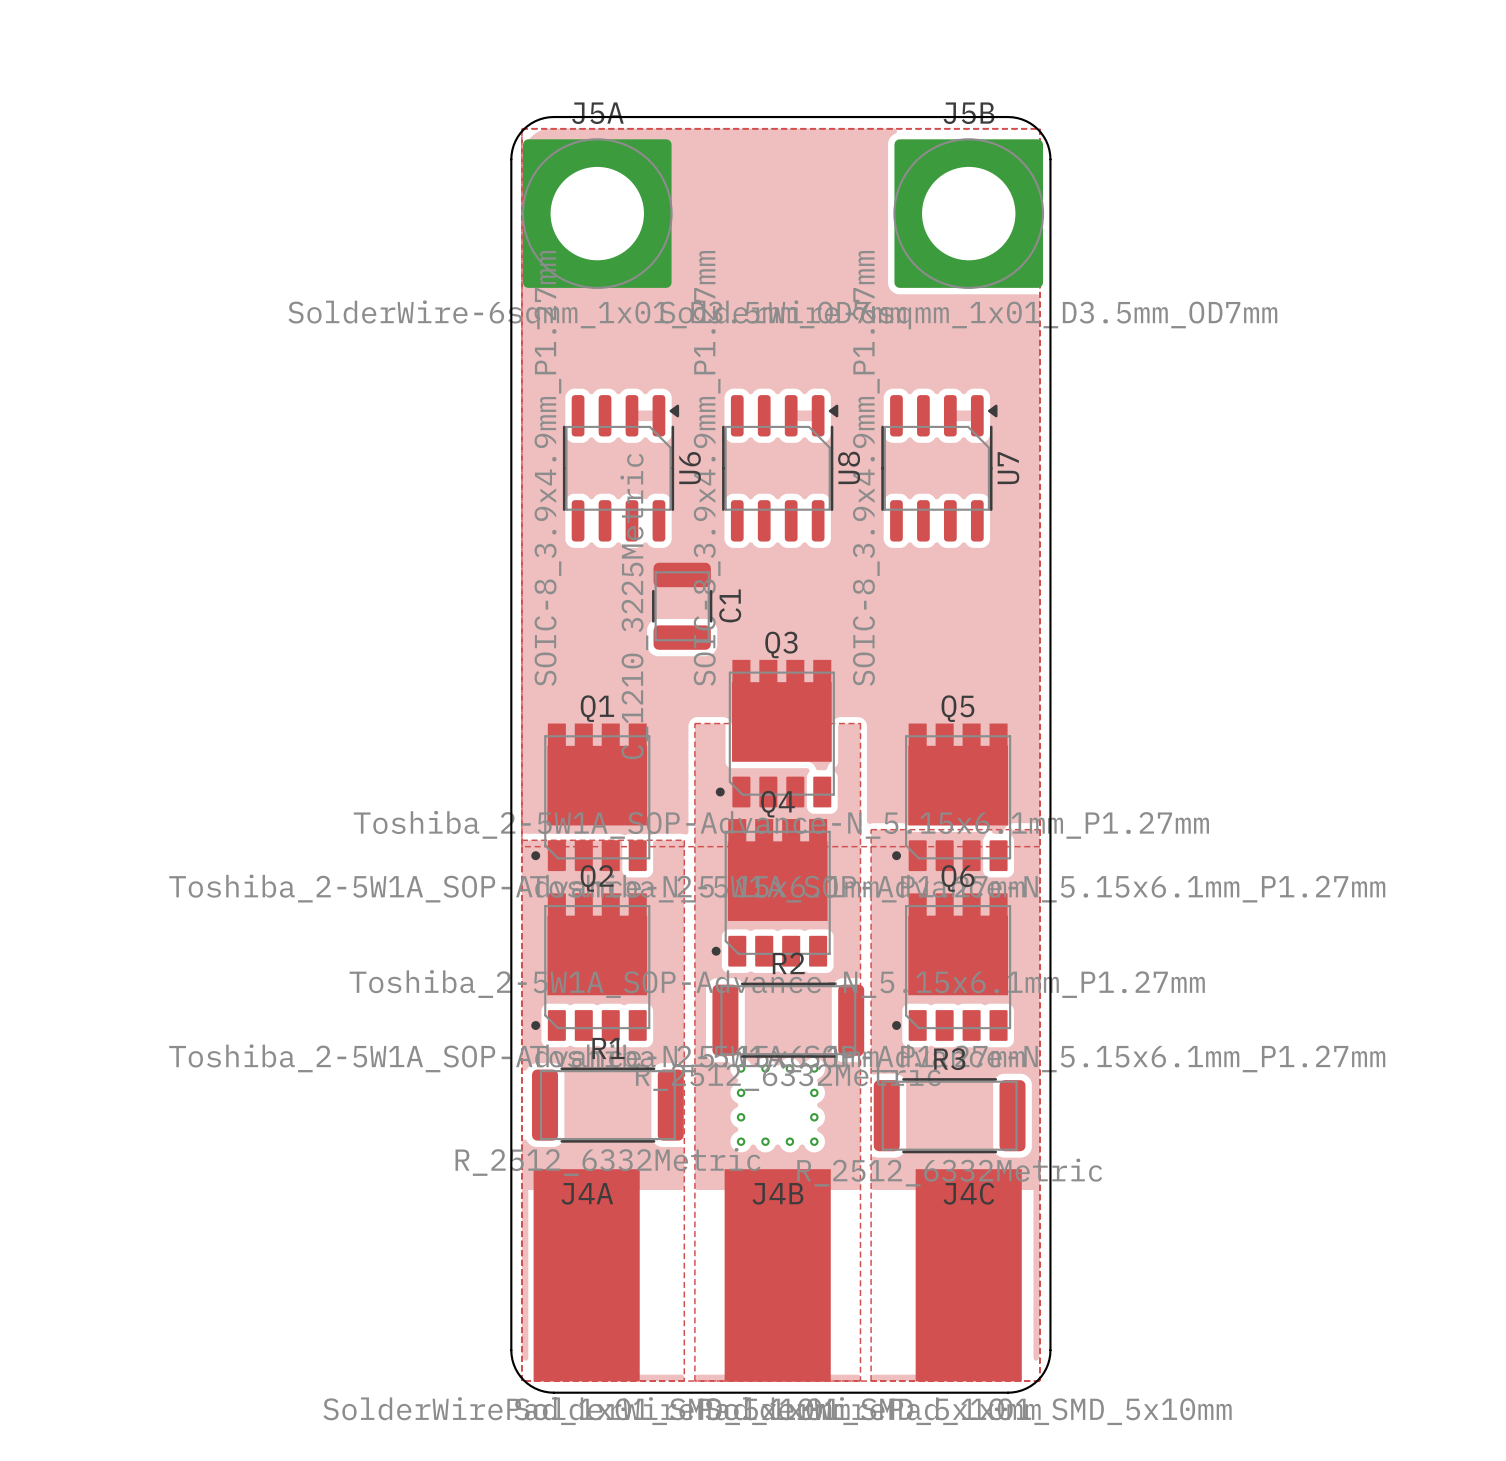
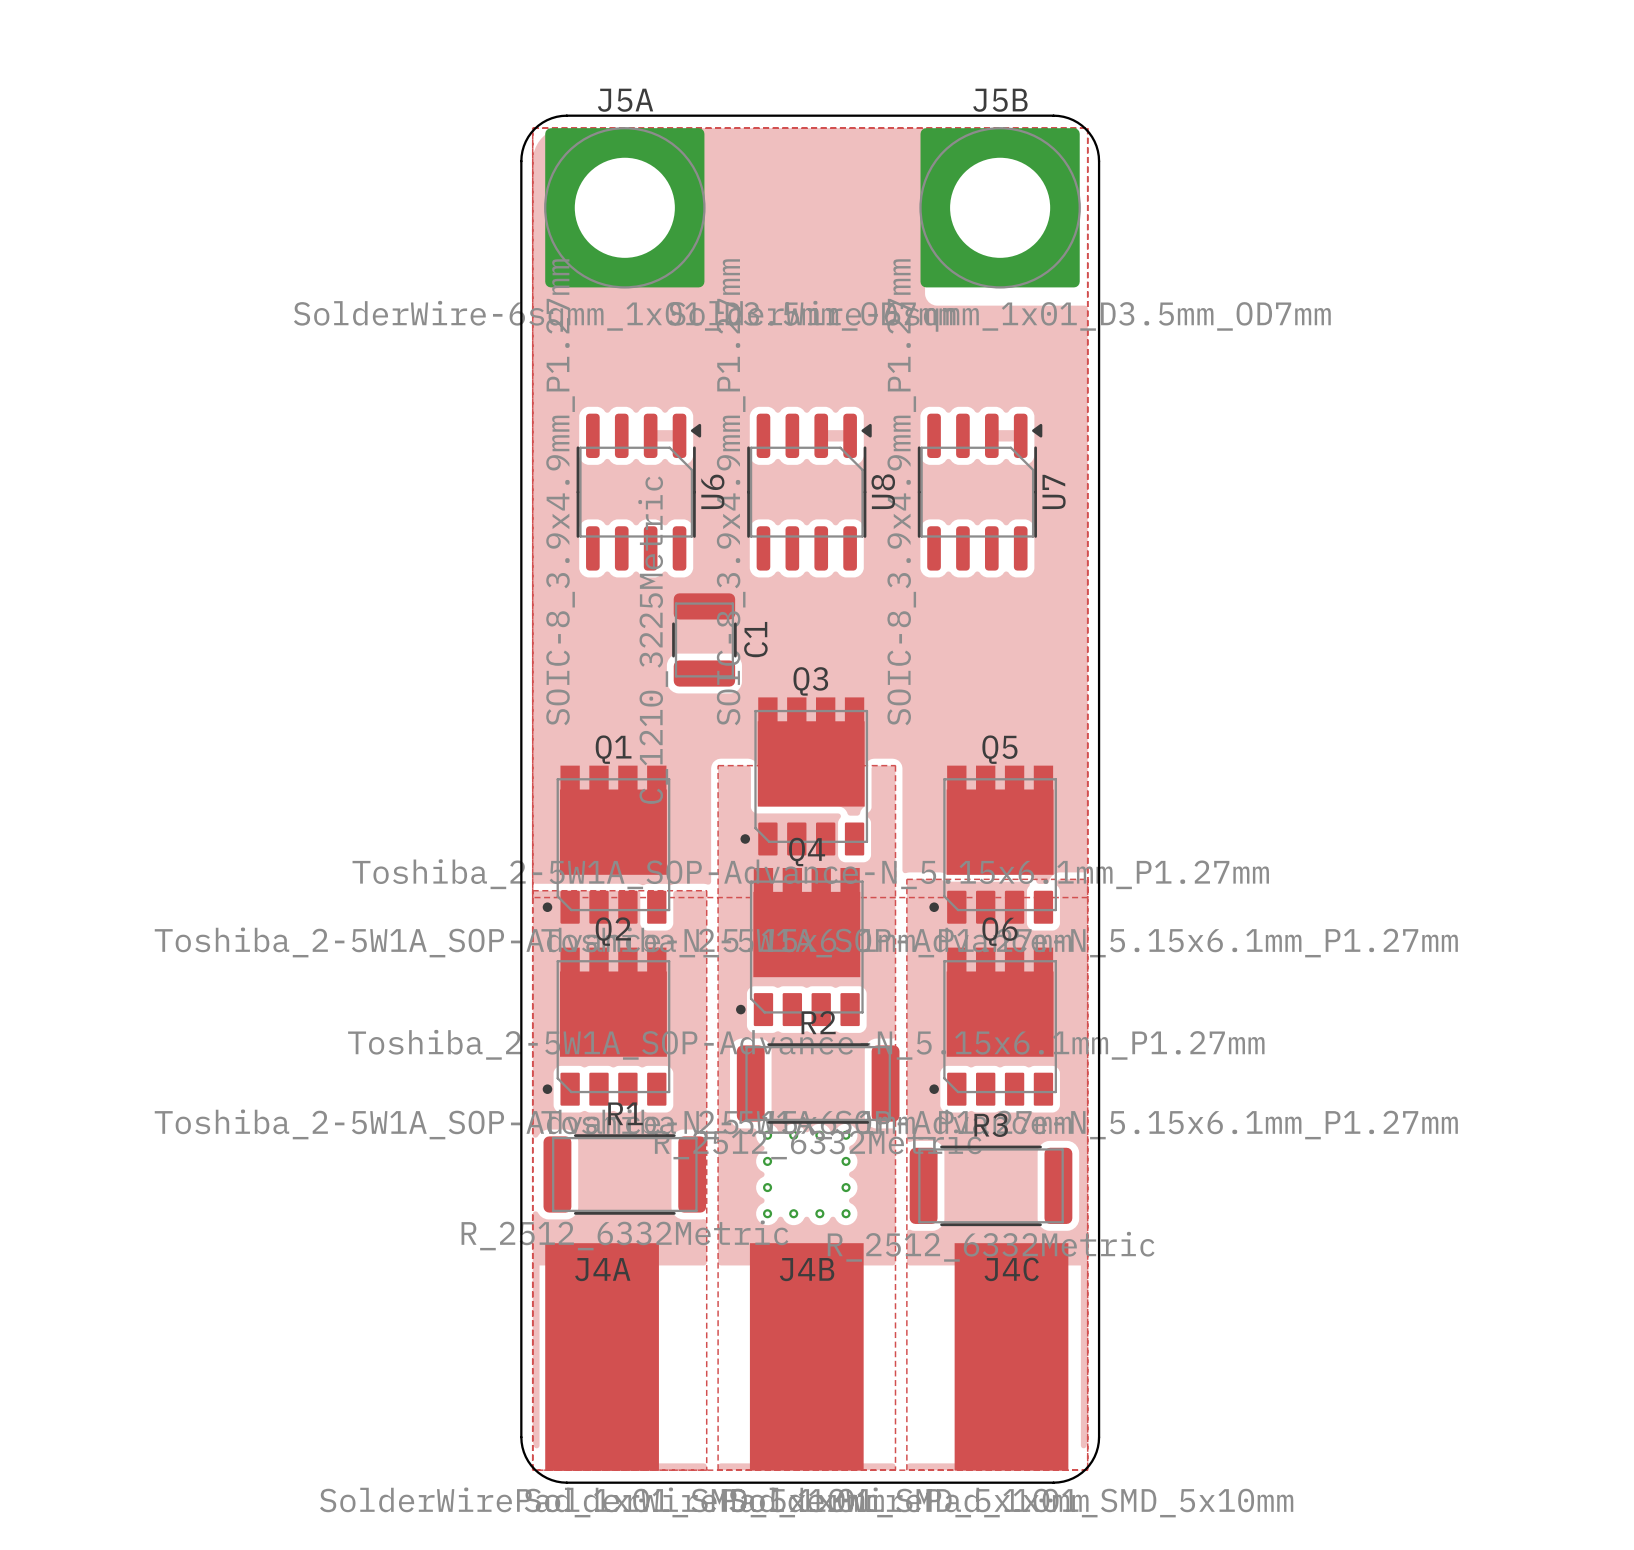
J5A position: (597, 213) -> (624, 207)
J5B position: (968, 213) -> (1000, 207)

